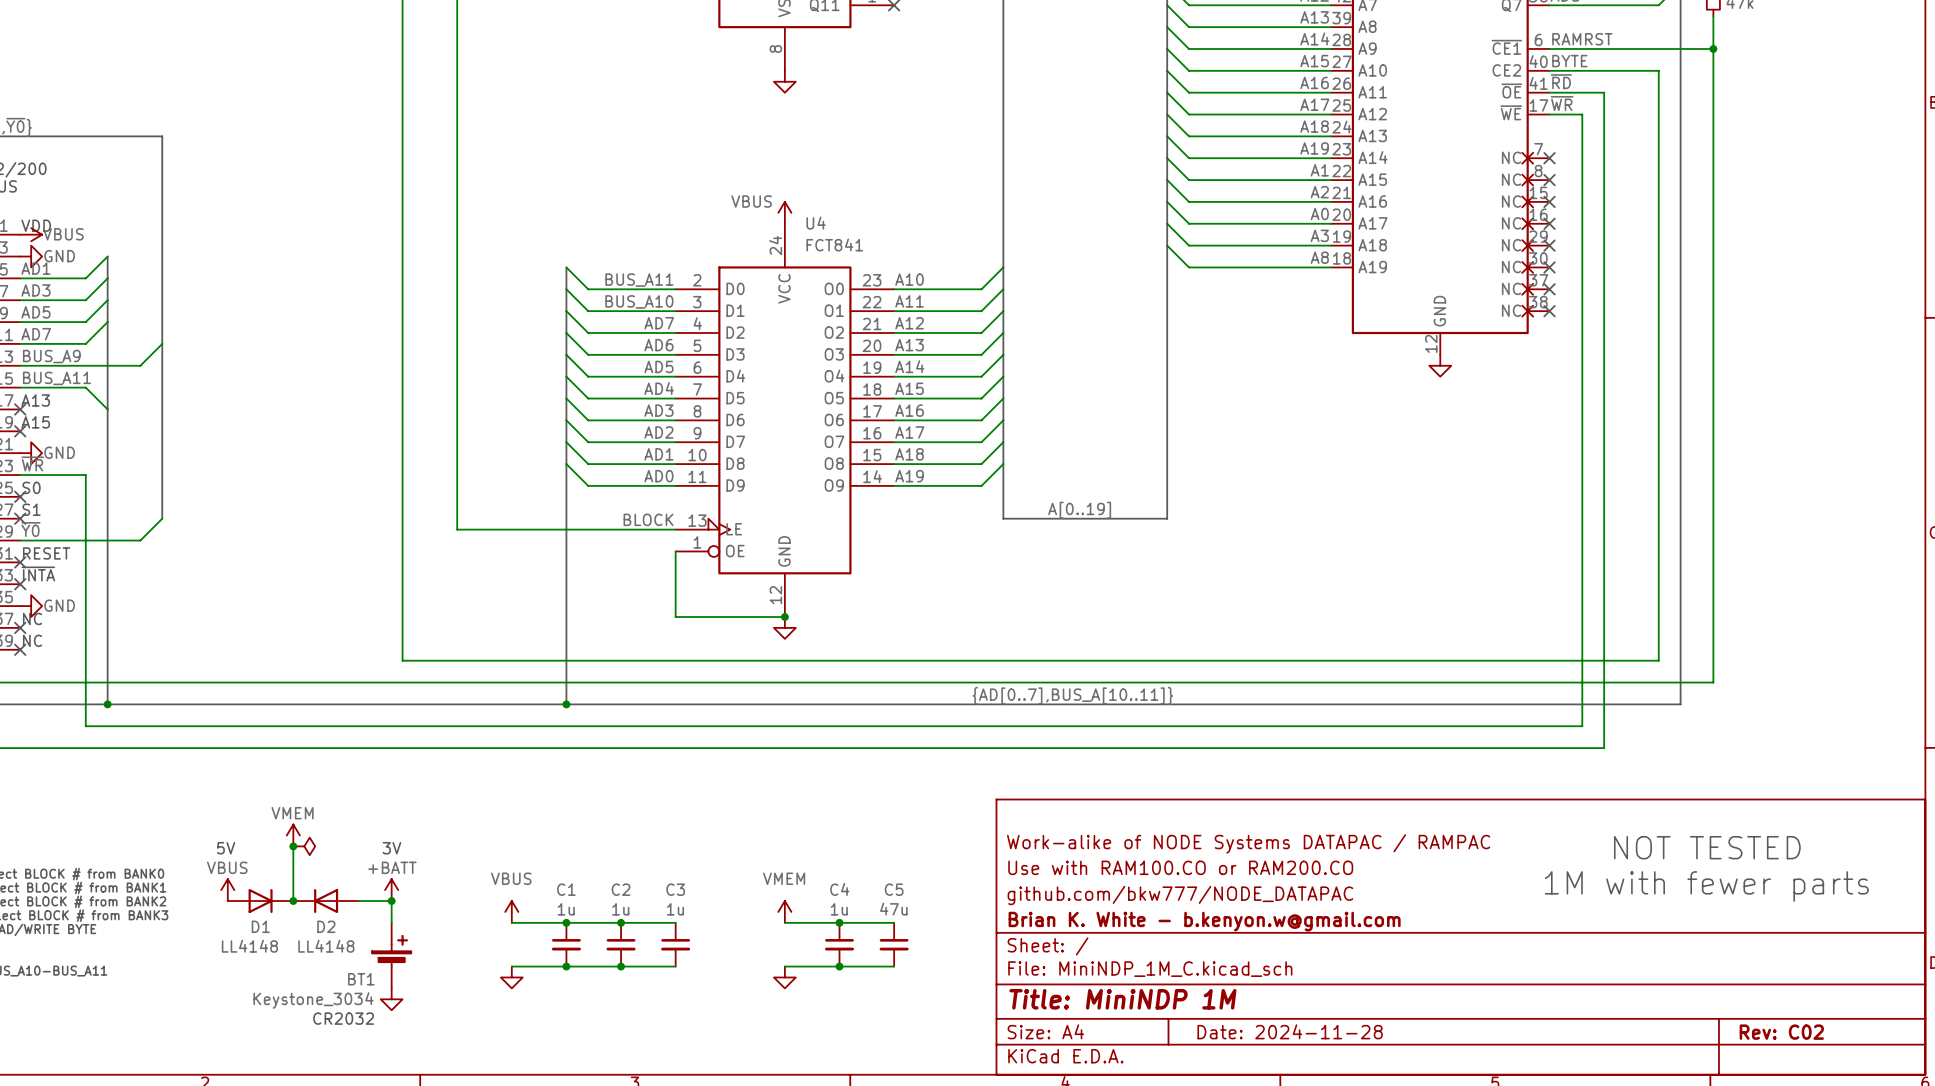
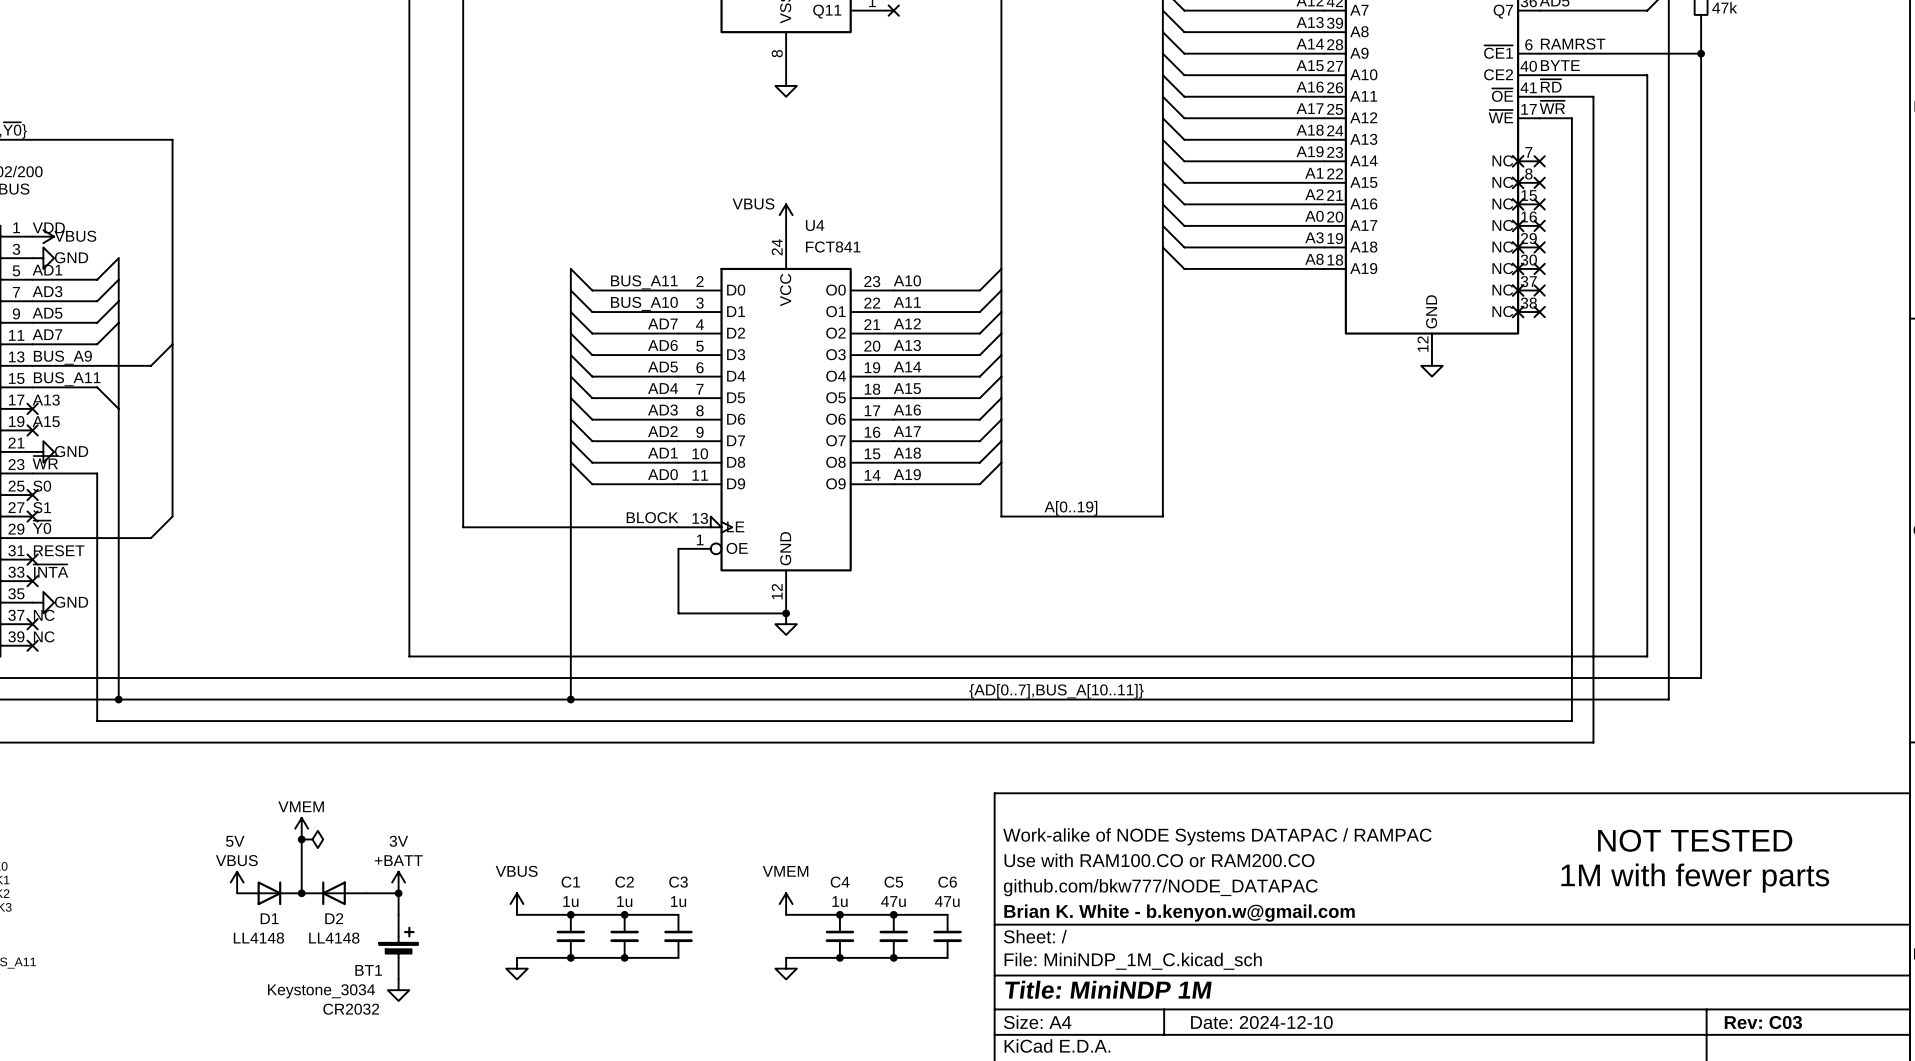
wire: none -> (893, 914) (947, 914)
junction: none -> (893, 914)
C6: none -> 47u (947, 936)
wire: none -> (893, 957) (947, 957)
junction: none -> (893, 957)
title block: Date: 2024-11-28 (1290, 1031) -> Date: 2024-12-10 (1261, 1022)
title block: Rev: C02 (1781, 1032) -> Rev: C03 (1763, 1022)

